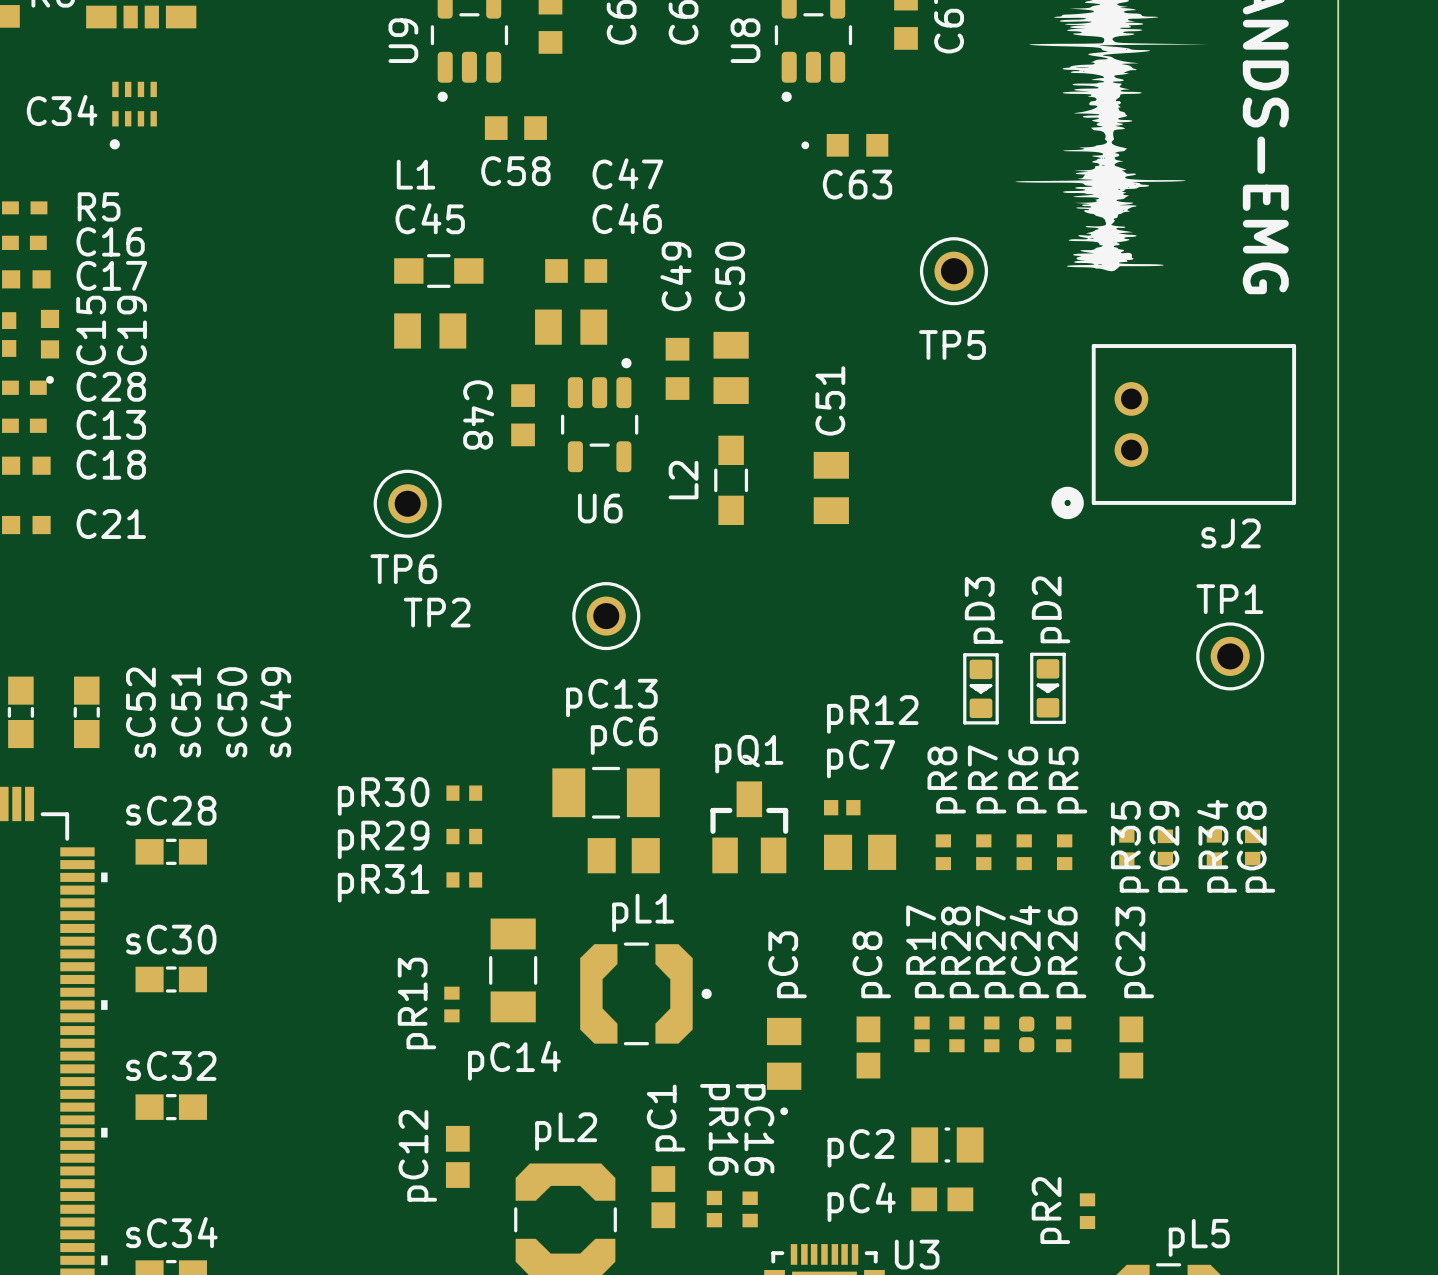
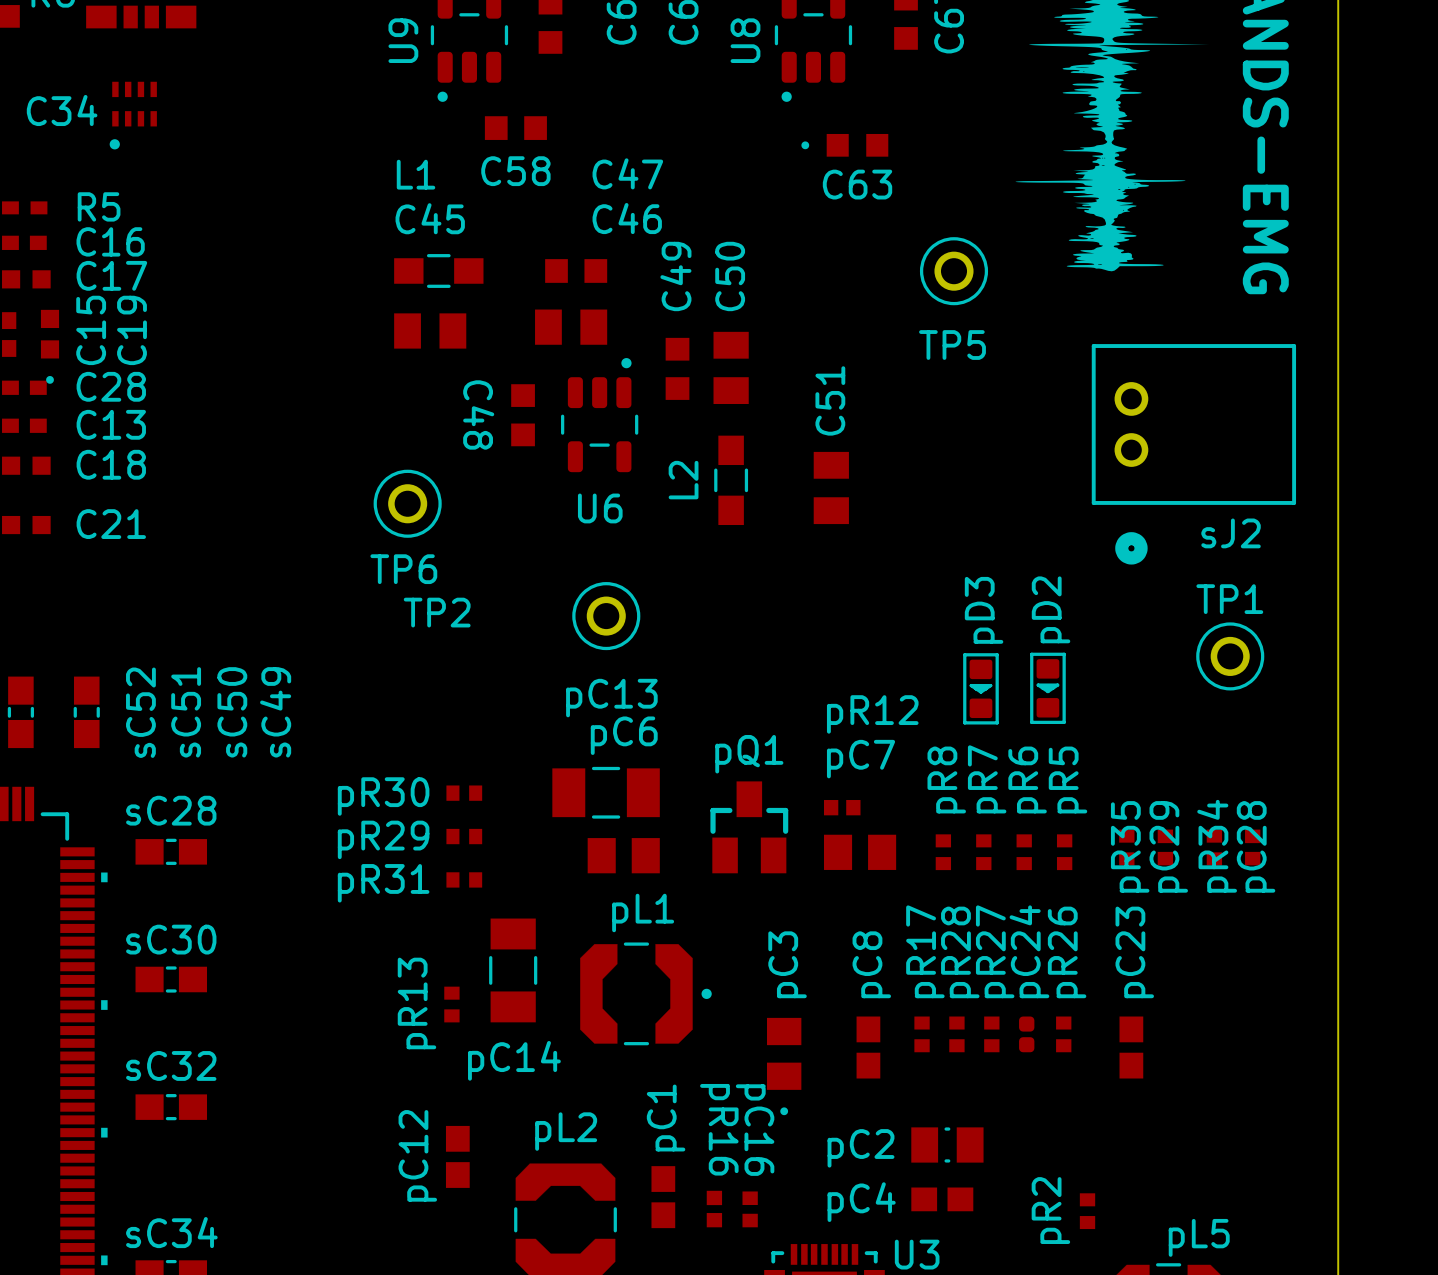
sJ2 footprint: [1051, 344, 1297, 520] -> [1091, 344, 1297, 565]

